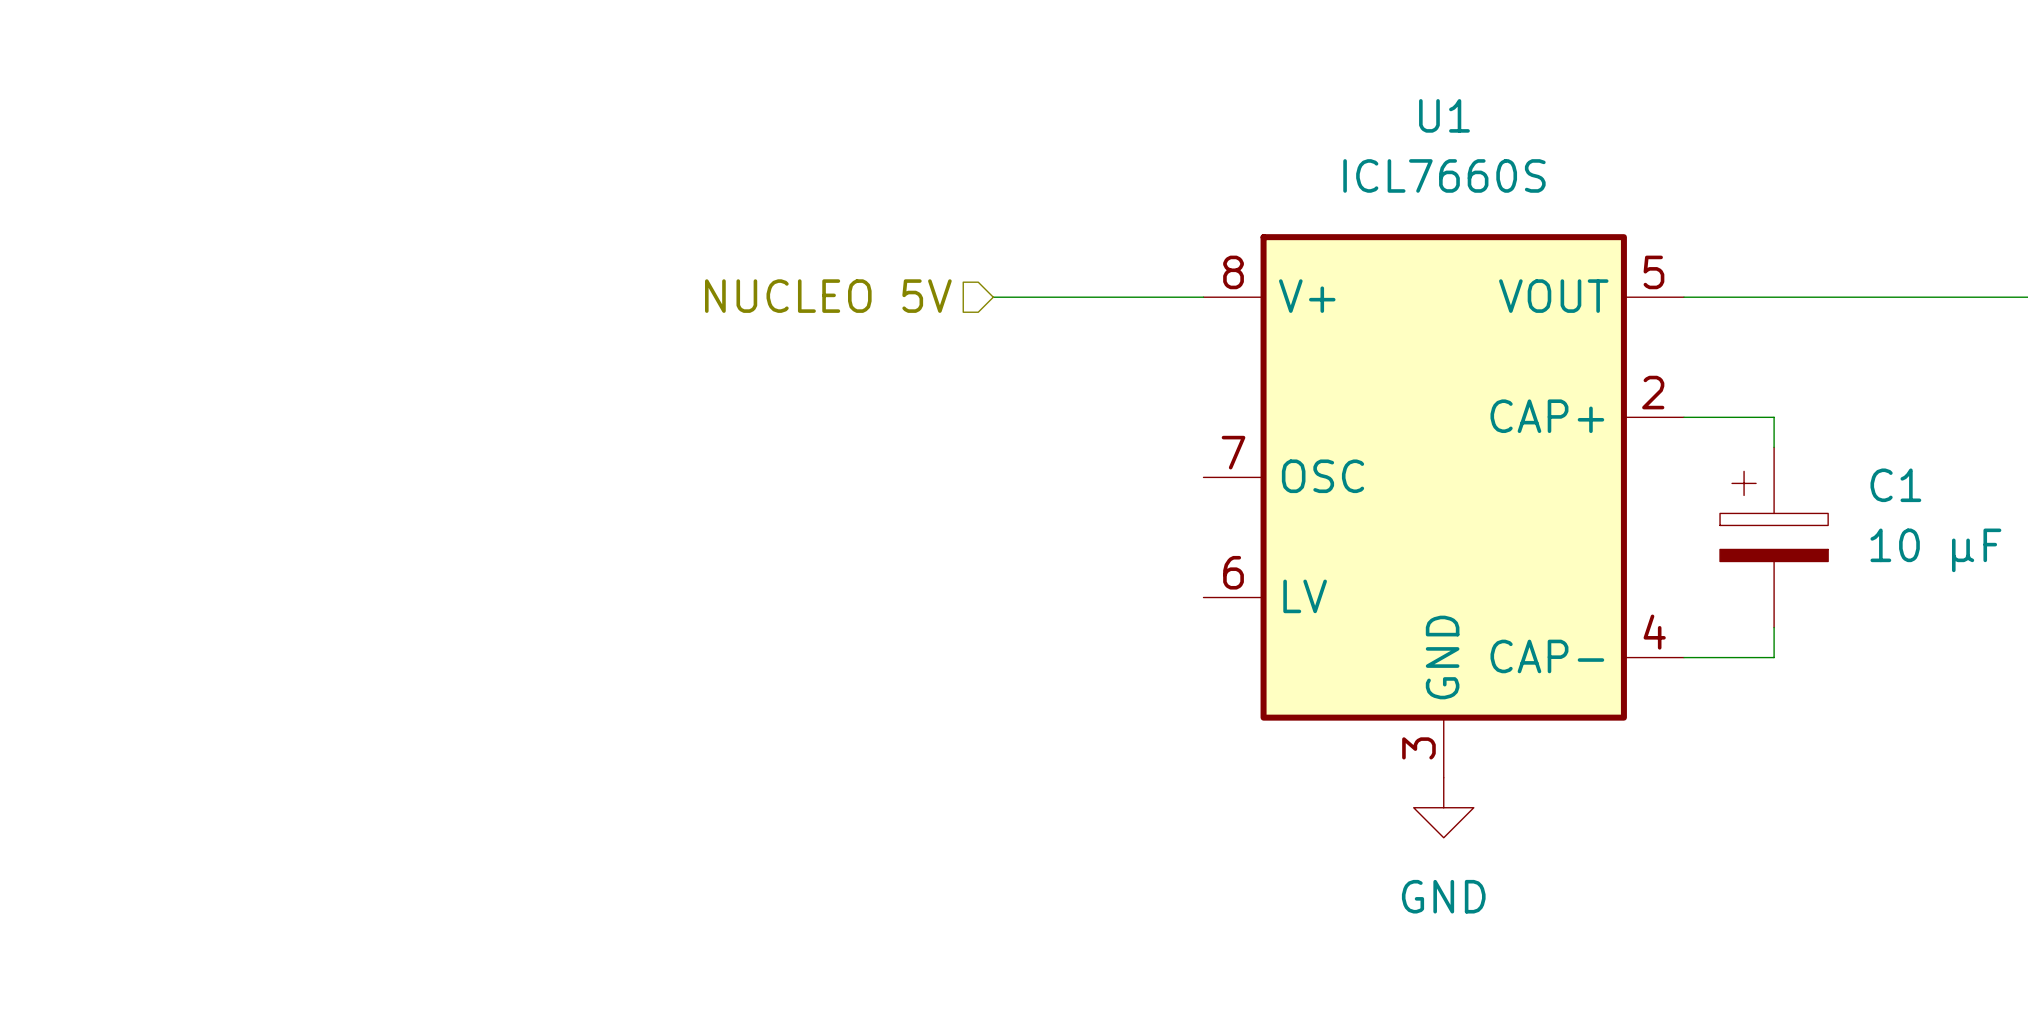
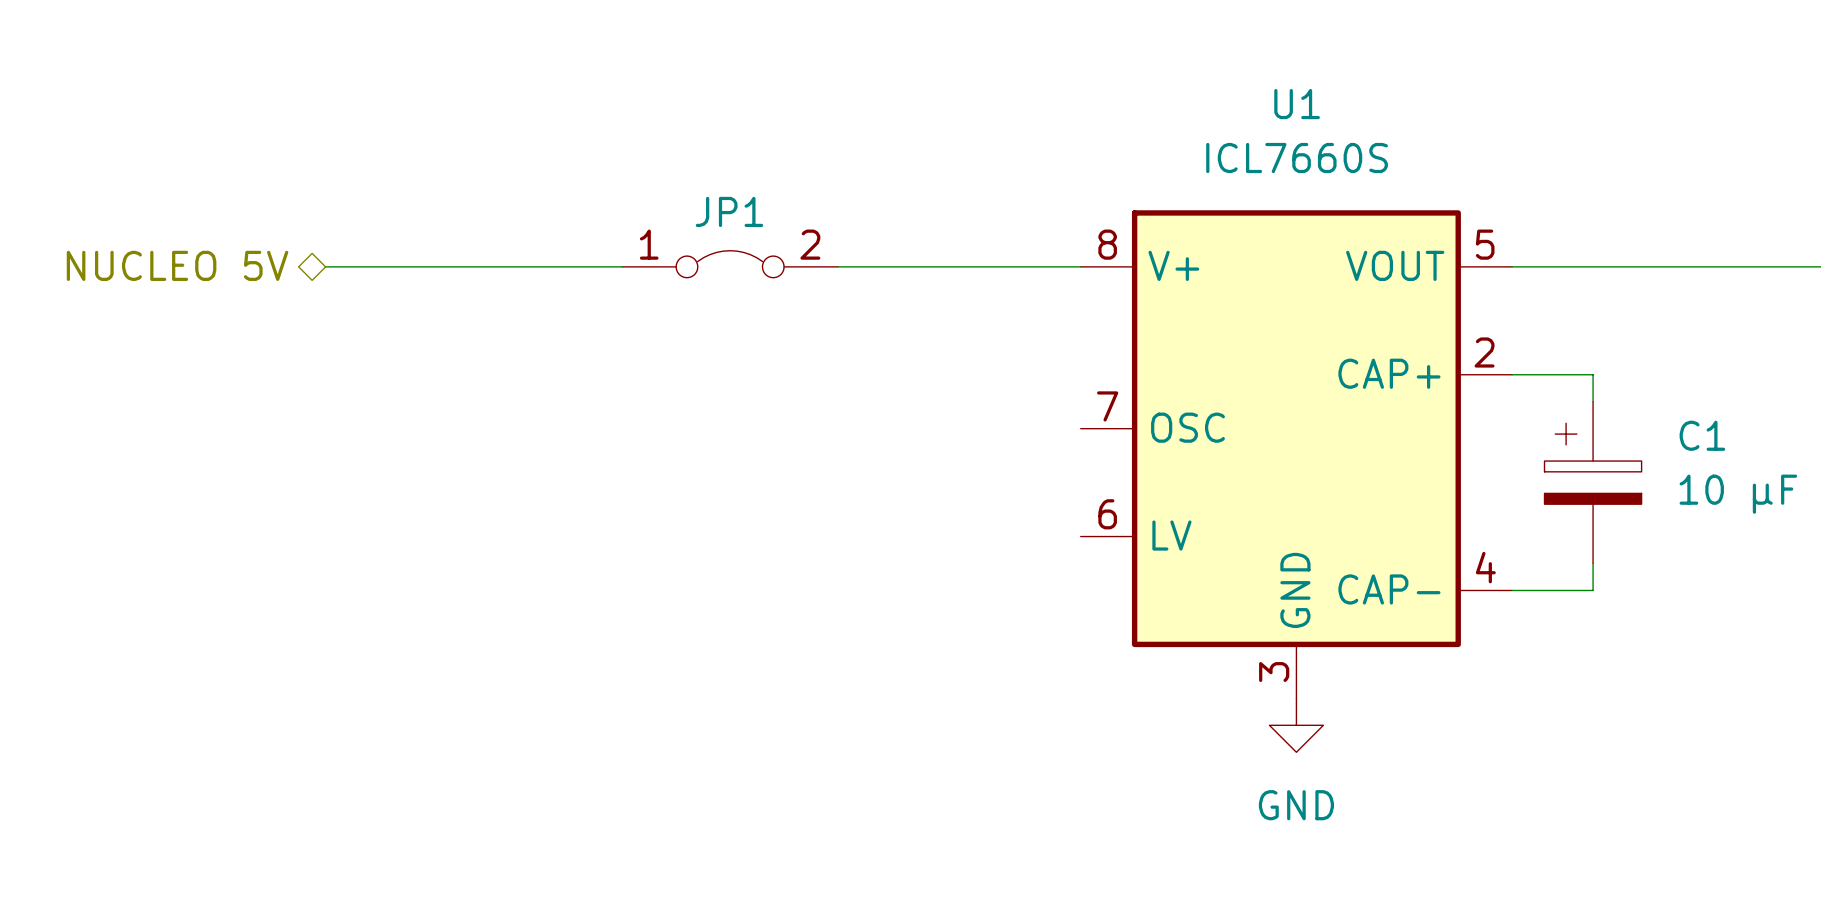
JP1: none -> (730, 264)
hierarchical label: none -> NUCLEO 5V (177, 265)
hierarchical label: NUCLEO 5V (828, 296) -> none
wire: none -> (325, 266) (622, 266)
wire: none -> (837, 266) (891, 266)

